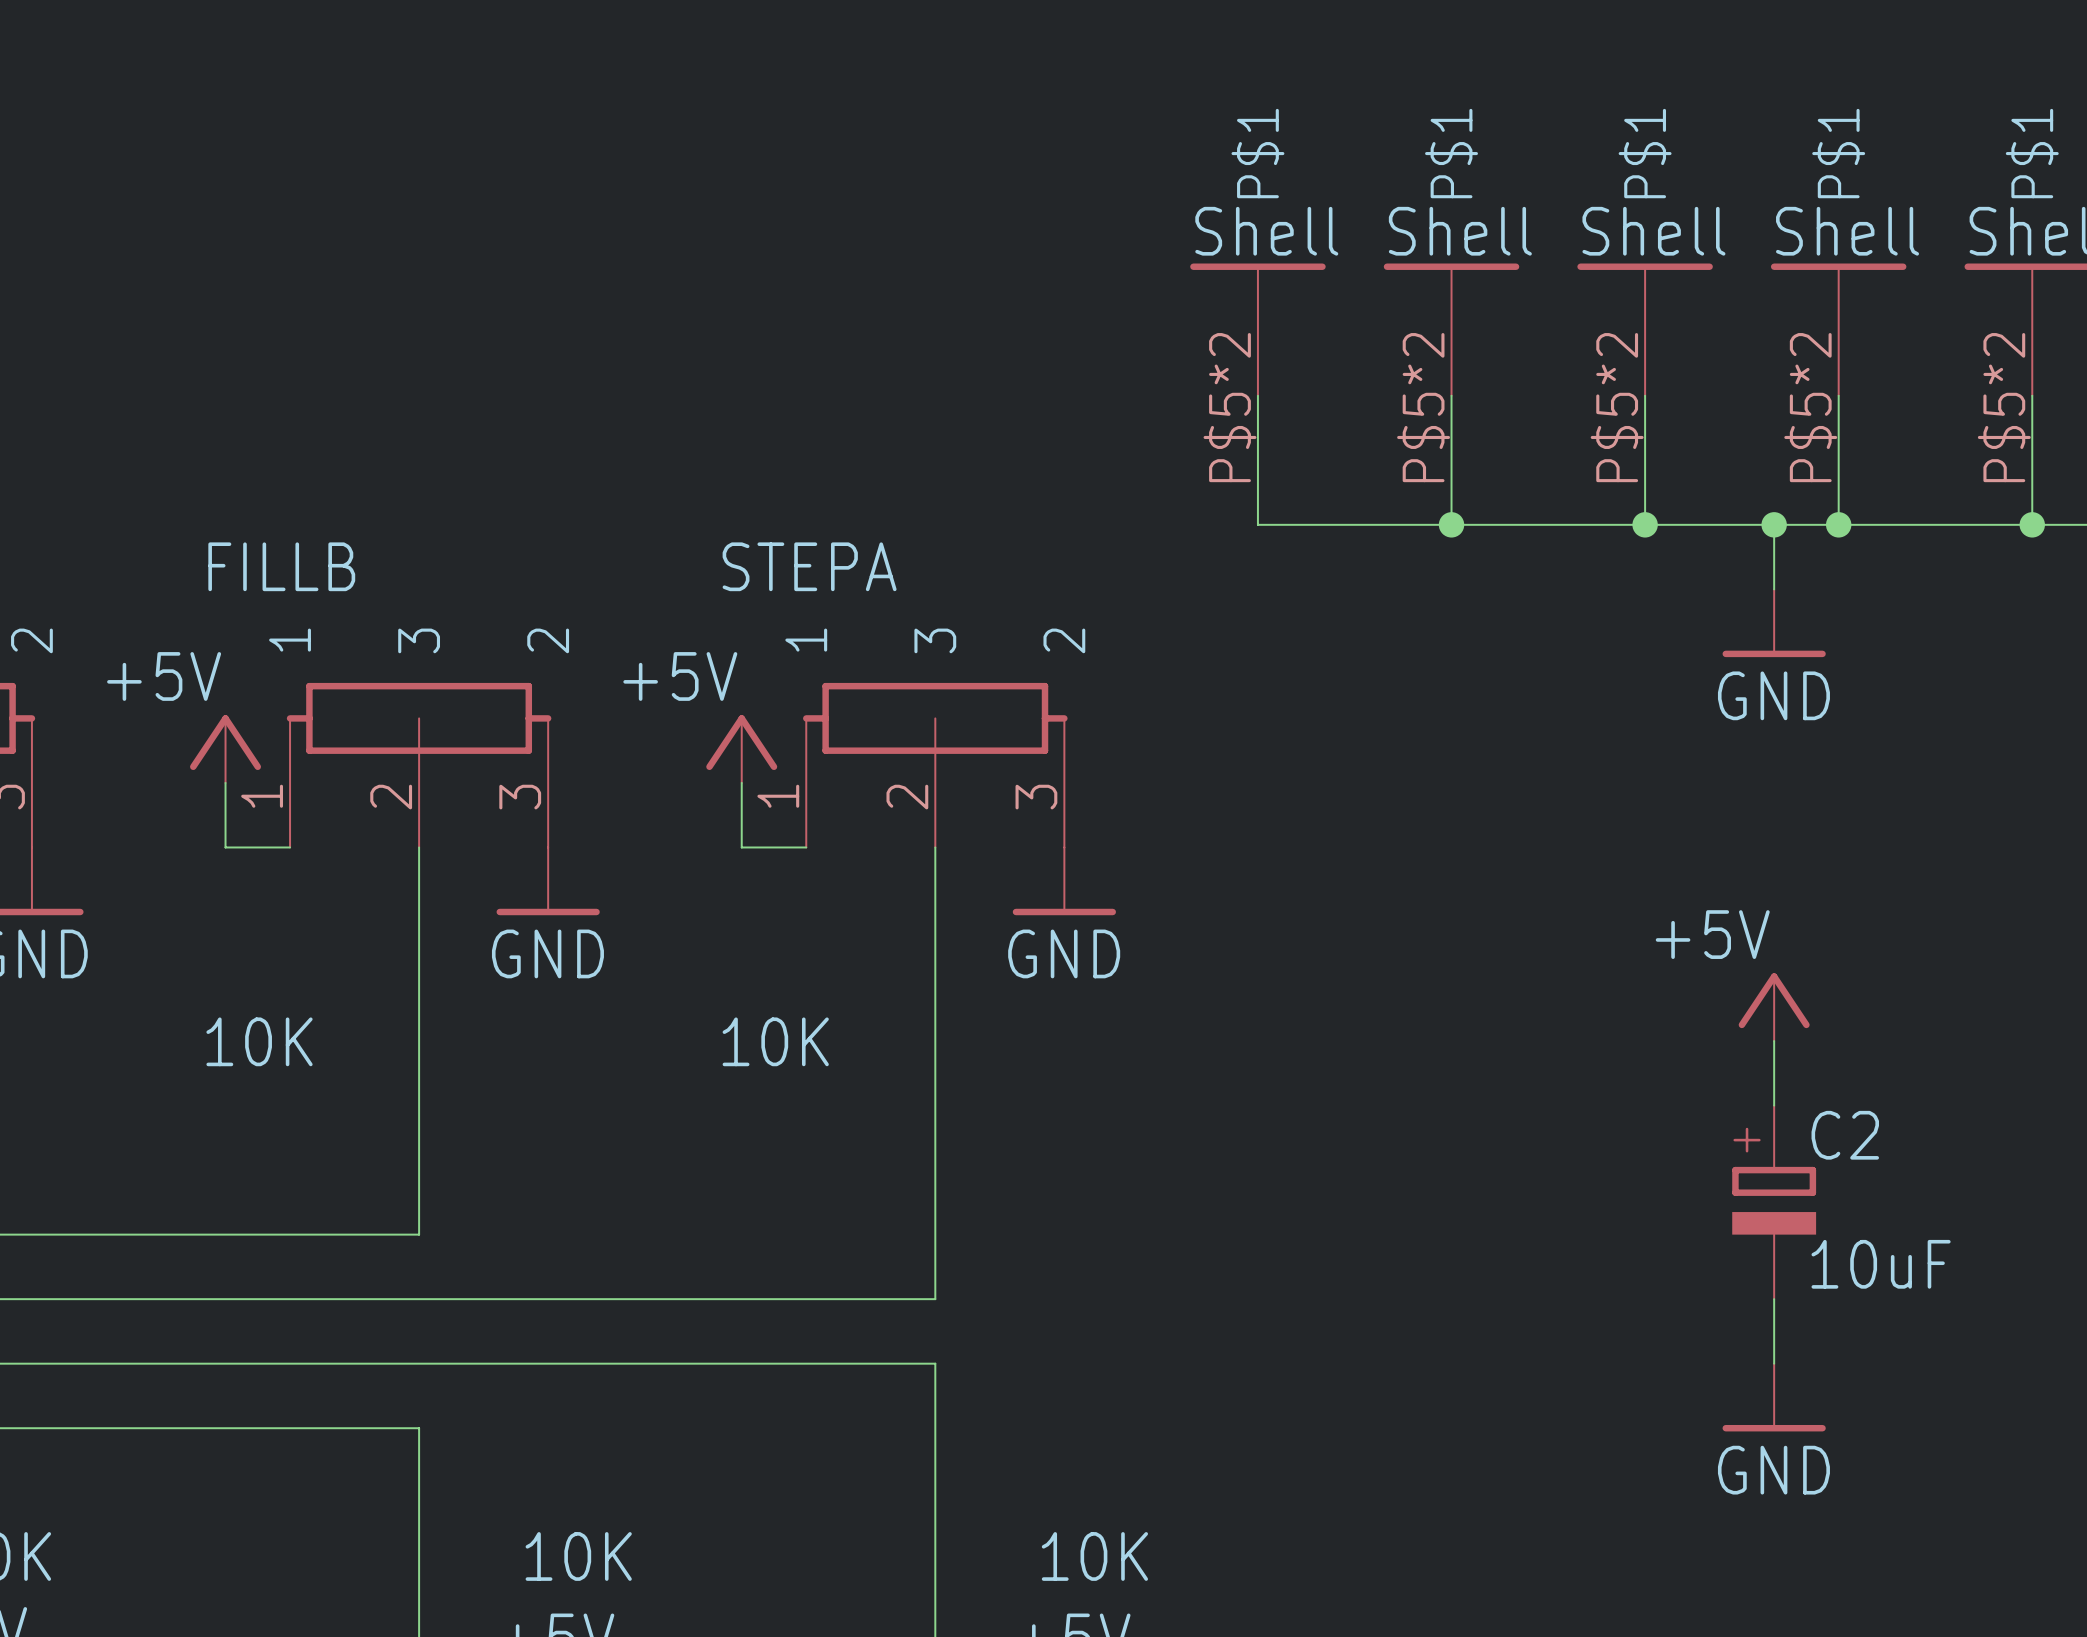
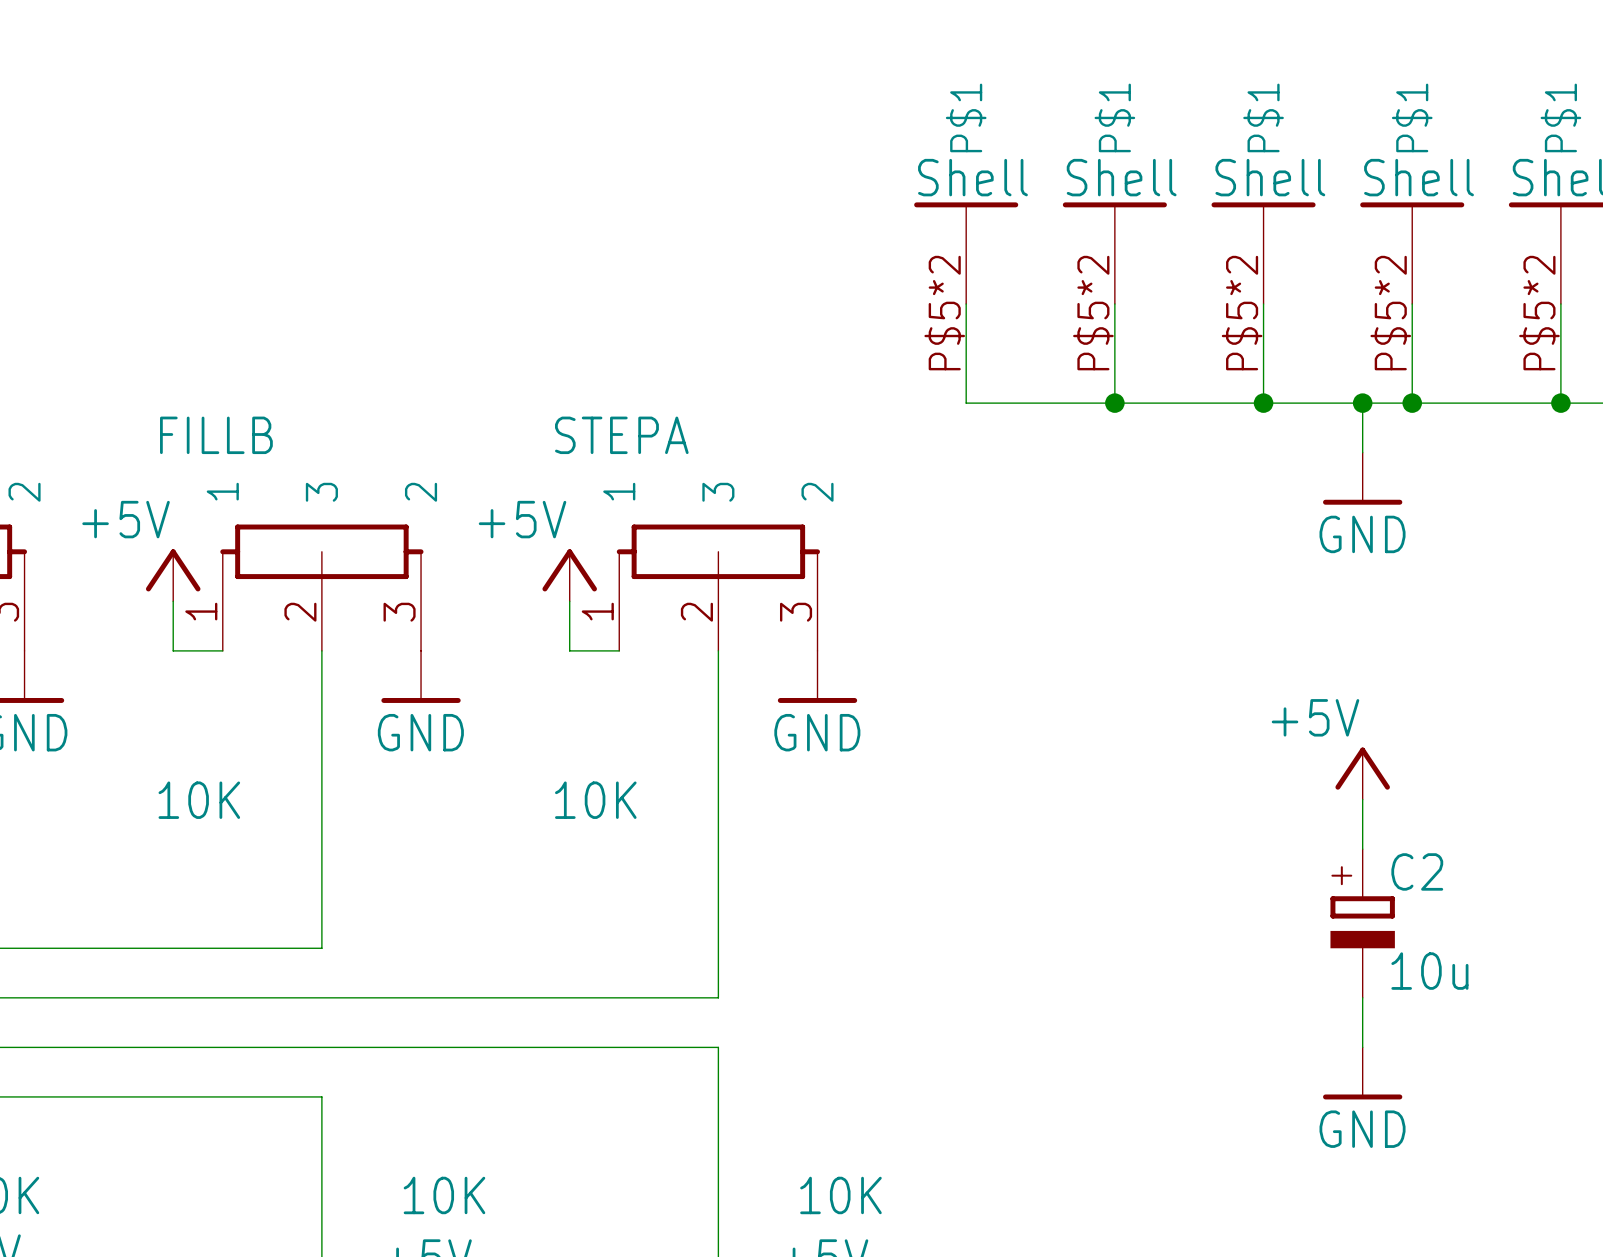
C2 value: 10uF (1881, 1264) -> 10u (1429, 971)

